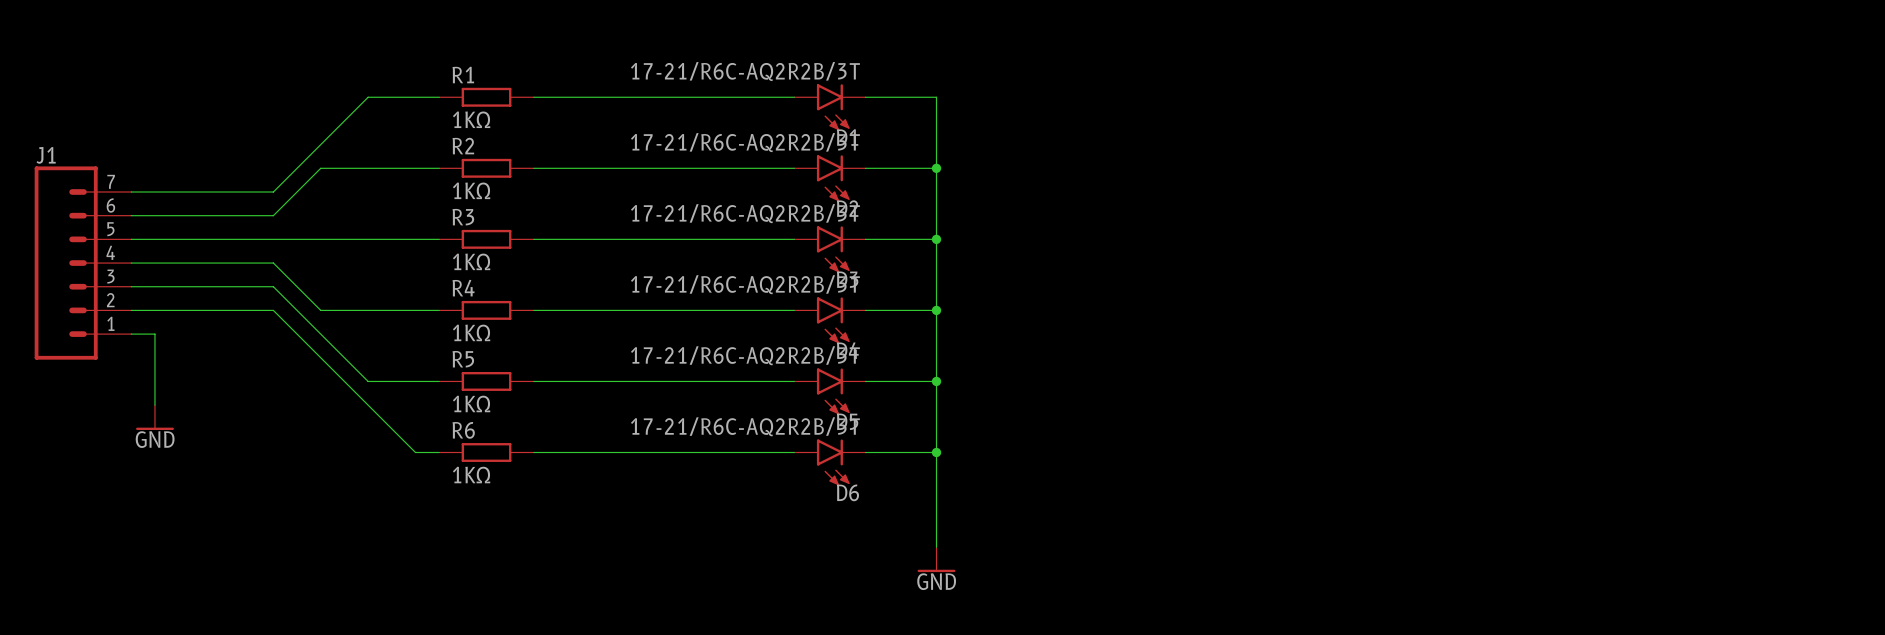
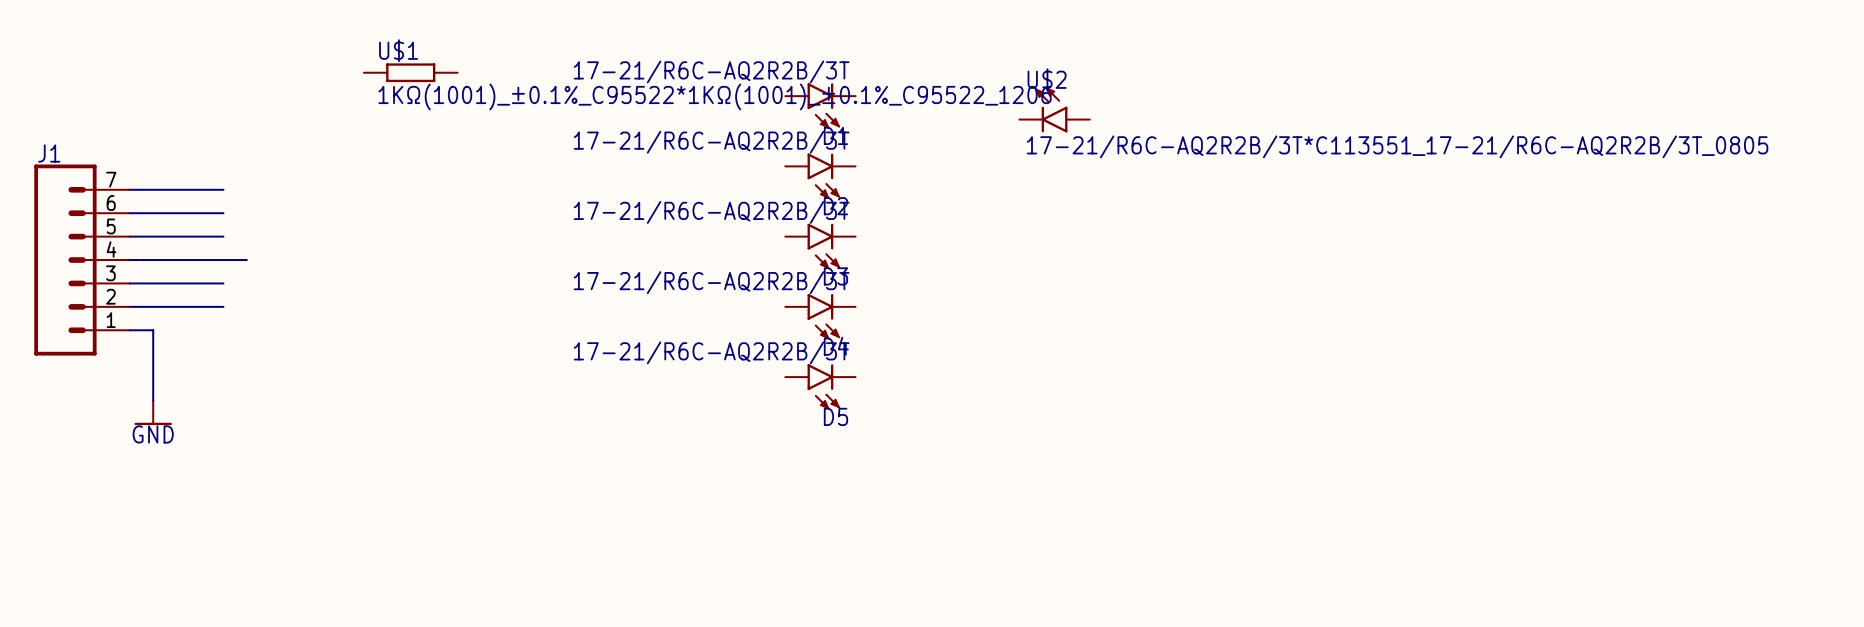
U$1: none -> 1KΩ(1001)_±0.1%_C95522*1KΩ(1001)_±0.1%_C95522_1206 (410, 72)
wire: (439, 97) (368, 97) (273, 191) (226, 191) -> none
R1: 1KΩ (486, 97) -> none
wire: (533, 97) (794, 97) -> none
wire: (865, 97) (936, 97) (936, 547) -> none
U$2: none -> 17-21/R6C-AQ2R2B/3T*C113551_17-21/R6C-AQ2R2B/3T_0805 (1054, 109)
wire: (439, 168) (320, 168) (273, 215) (226, 215) -> none
R2: 1KΩ (486, 168) -> none
wire: (533, 168) (794, 168) -> none
wire: (865, 168) (936, 168) -> none
junction: (936, 168) -> none
wire: (226, 239) (439, 239) -> none
R3: 1KΩ (486, 239) -> none
wire: (533, 239) (794, 239) -> none
wire: (865, 239) (936, 239) -> none
junction: (936, 239) -> none
wire: (249, 263) (273, 263) (320, 310) (439, 310) -> none
wire: (226, 286) (273, 286) (368, 381) (439, 381) -> none
wire: (226, 310) (273, 310) (415, 452) (439, 452) -> none
R4: 1KΩ (486, 310) -> none
wire: (533, 310) (794, 310) -> none
wire: (865, 310) (936, 310) -> none
junction: (936, 310) -> none
R5: 1KΩ (486, 381) -> none
wire: (533, 381) (794, 381) -> none
wire: (865, 381) (936, 381) -> none
junction: (936, 381) -> none
R6: 1KΩ (486, 452) -> none
wire: (533, 452) (794, 452) -> none
wire: (865, 452) (936, 452) -> none
junction: (936, 452) -> none
D6: 17-21/R6C-AQ2R2B/3T (829, 462) -> none
power symbol: GND (936, 559) -> none

